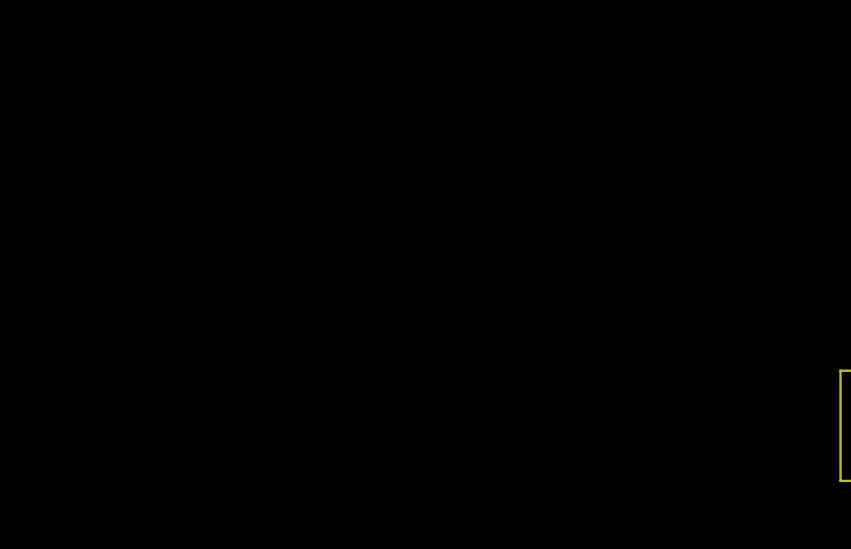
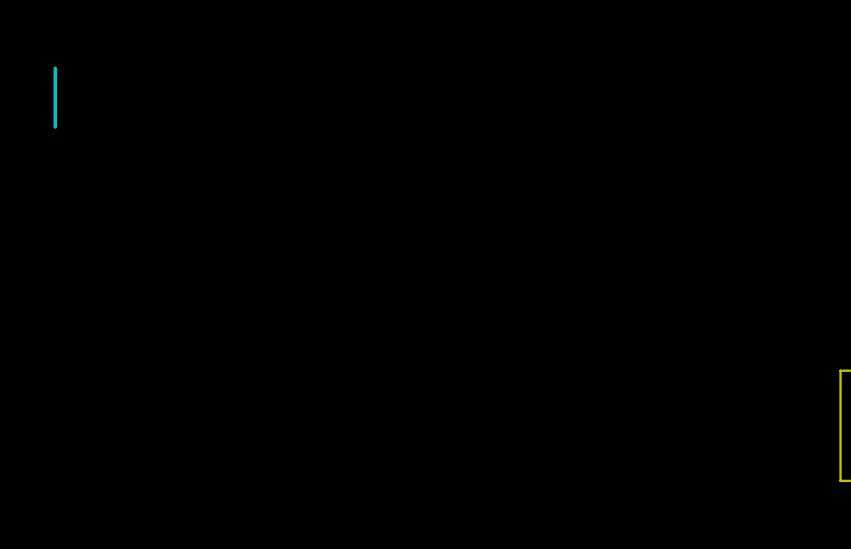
line: none -> (55, 68) (55, 126)

